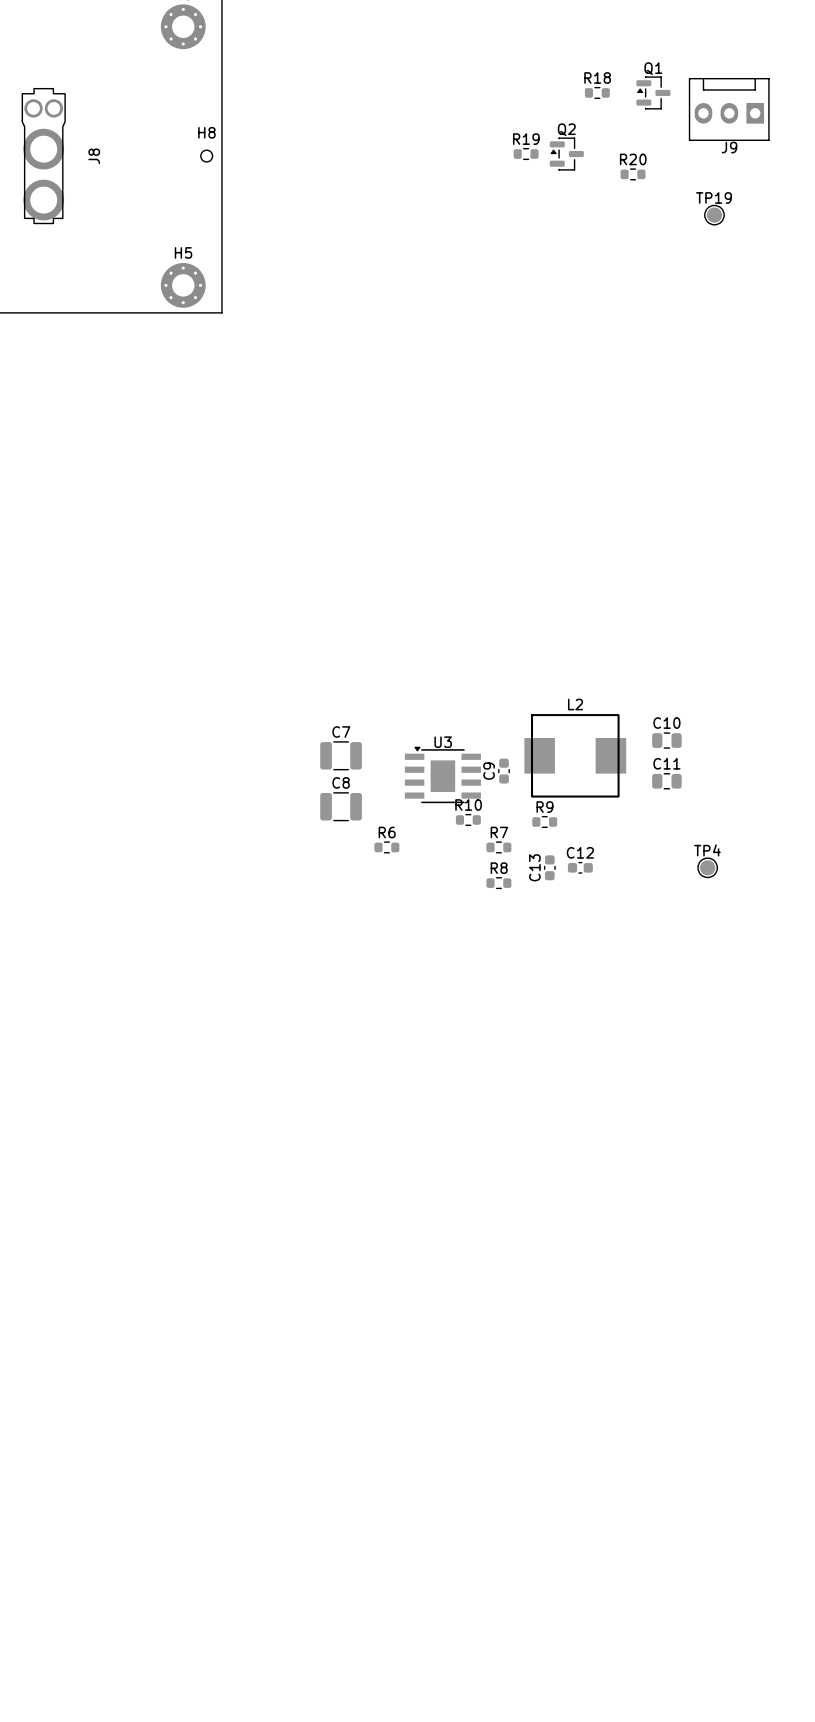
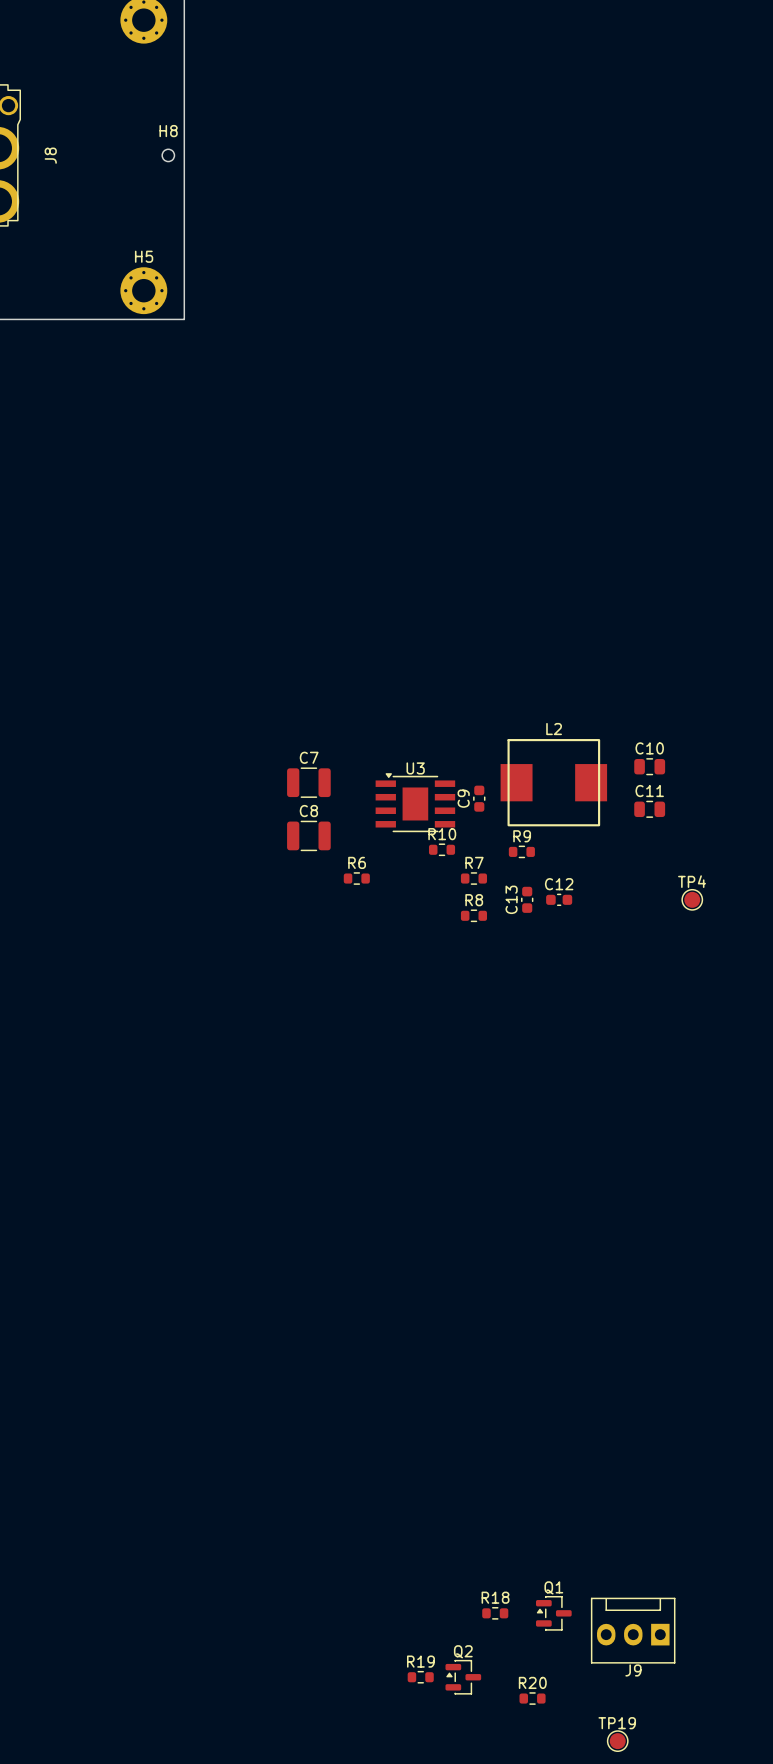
R18 position: (597, 92) -> (495, 1613)
Q1 position: (653, 92) -> (553, 1613)
J9 position: (729, 109) -> (633, 1630)
R19 position: (526, 154) -> (420, 1677)
Q2 position: (566, 154) -> (463, 1677)
R20 position: (633, 174) -> (532, 1698)
TP19 position: (714, 215) -> (617, 1741)

